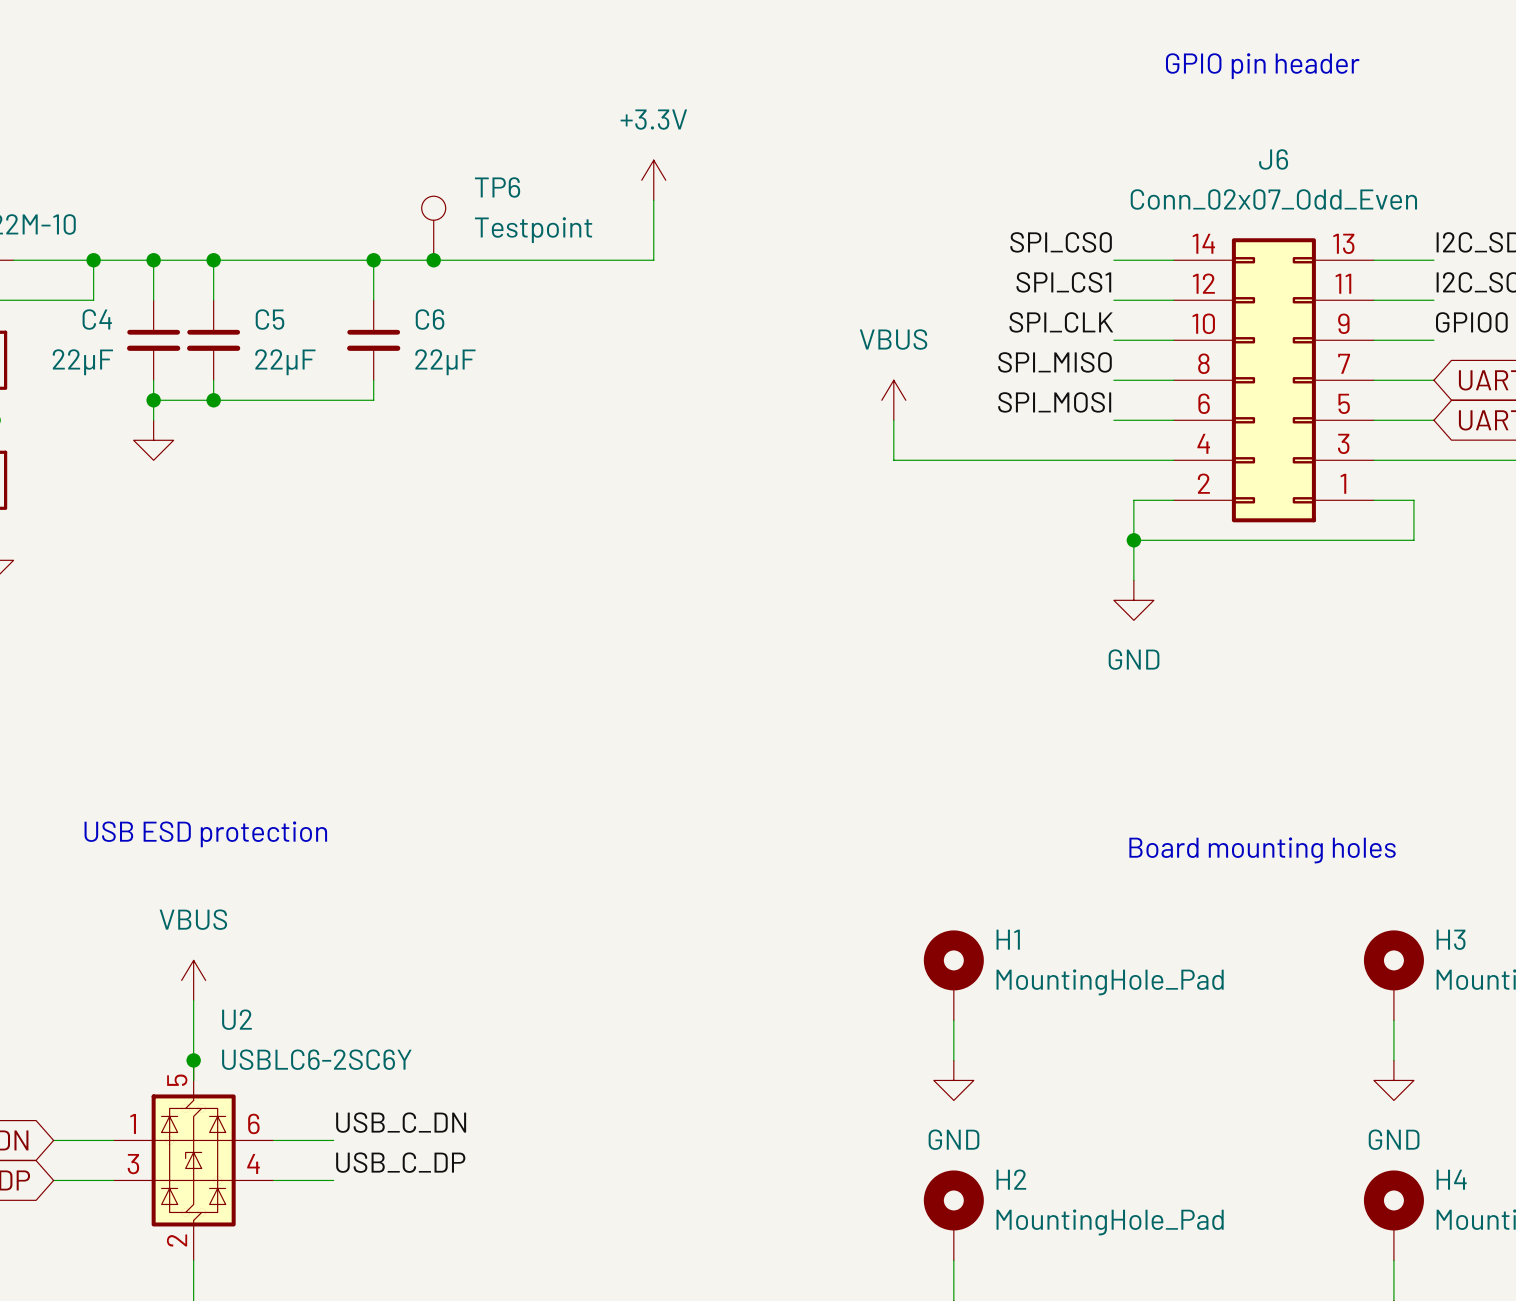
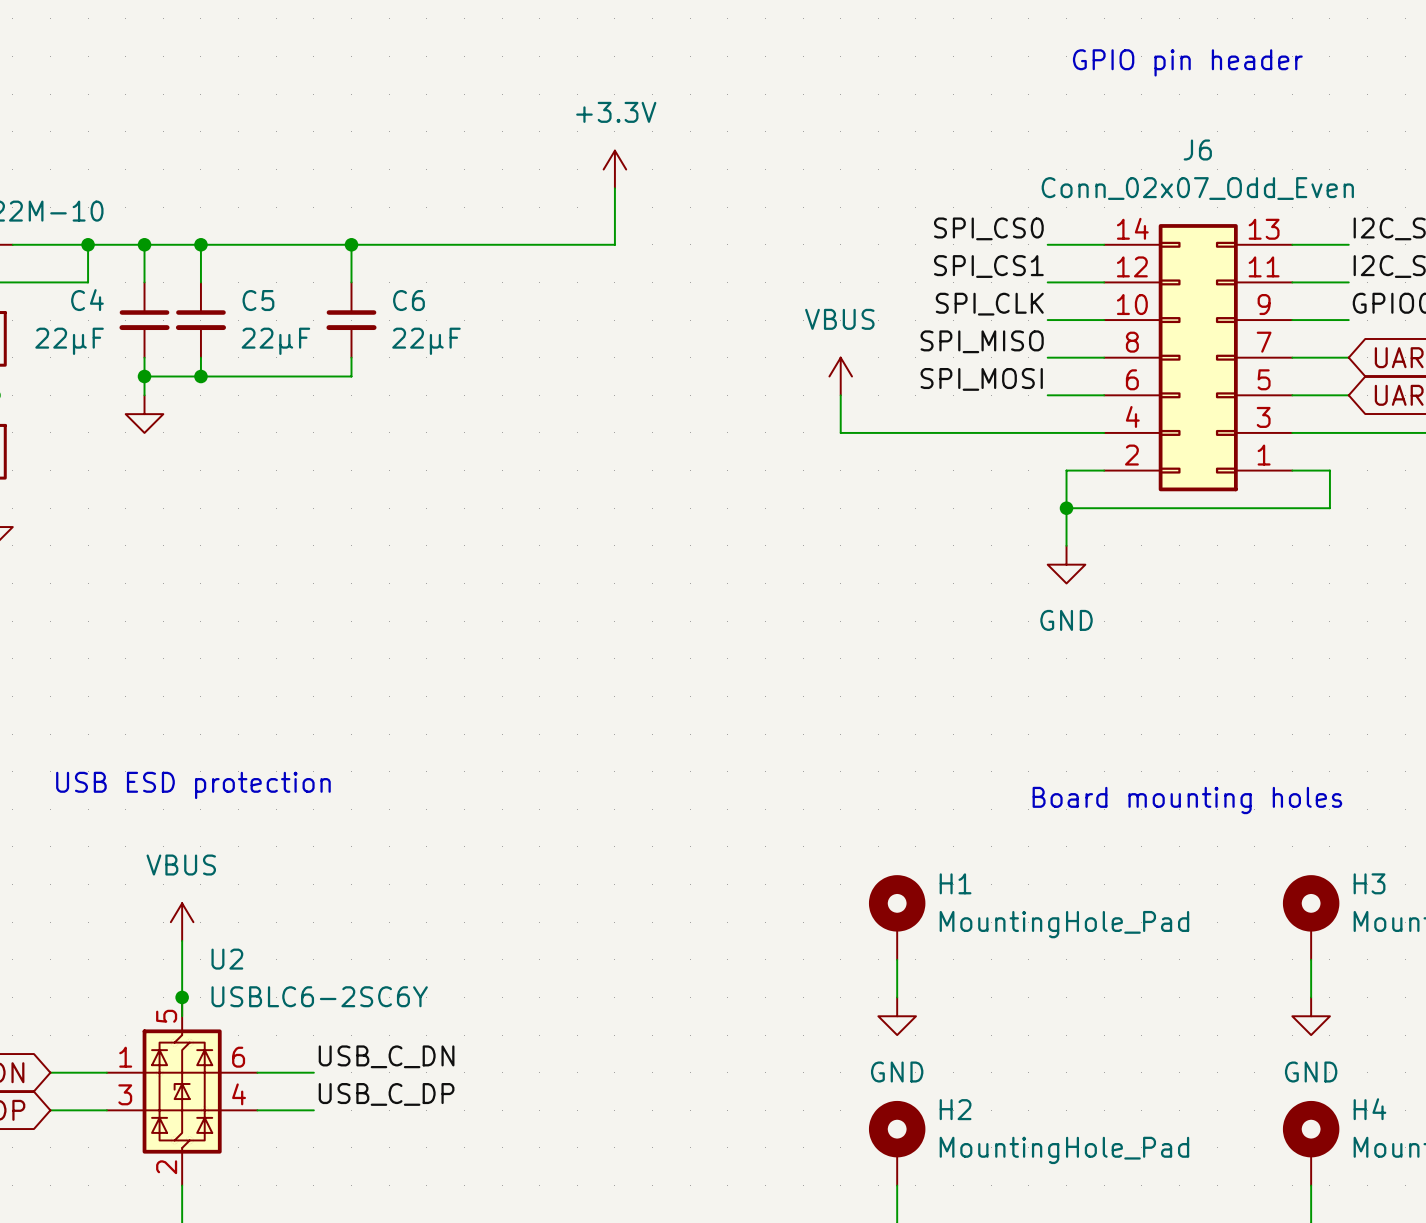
TP6: Testpoint (433, 228) -> none
junction: (433, 260) -> none

